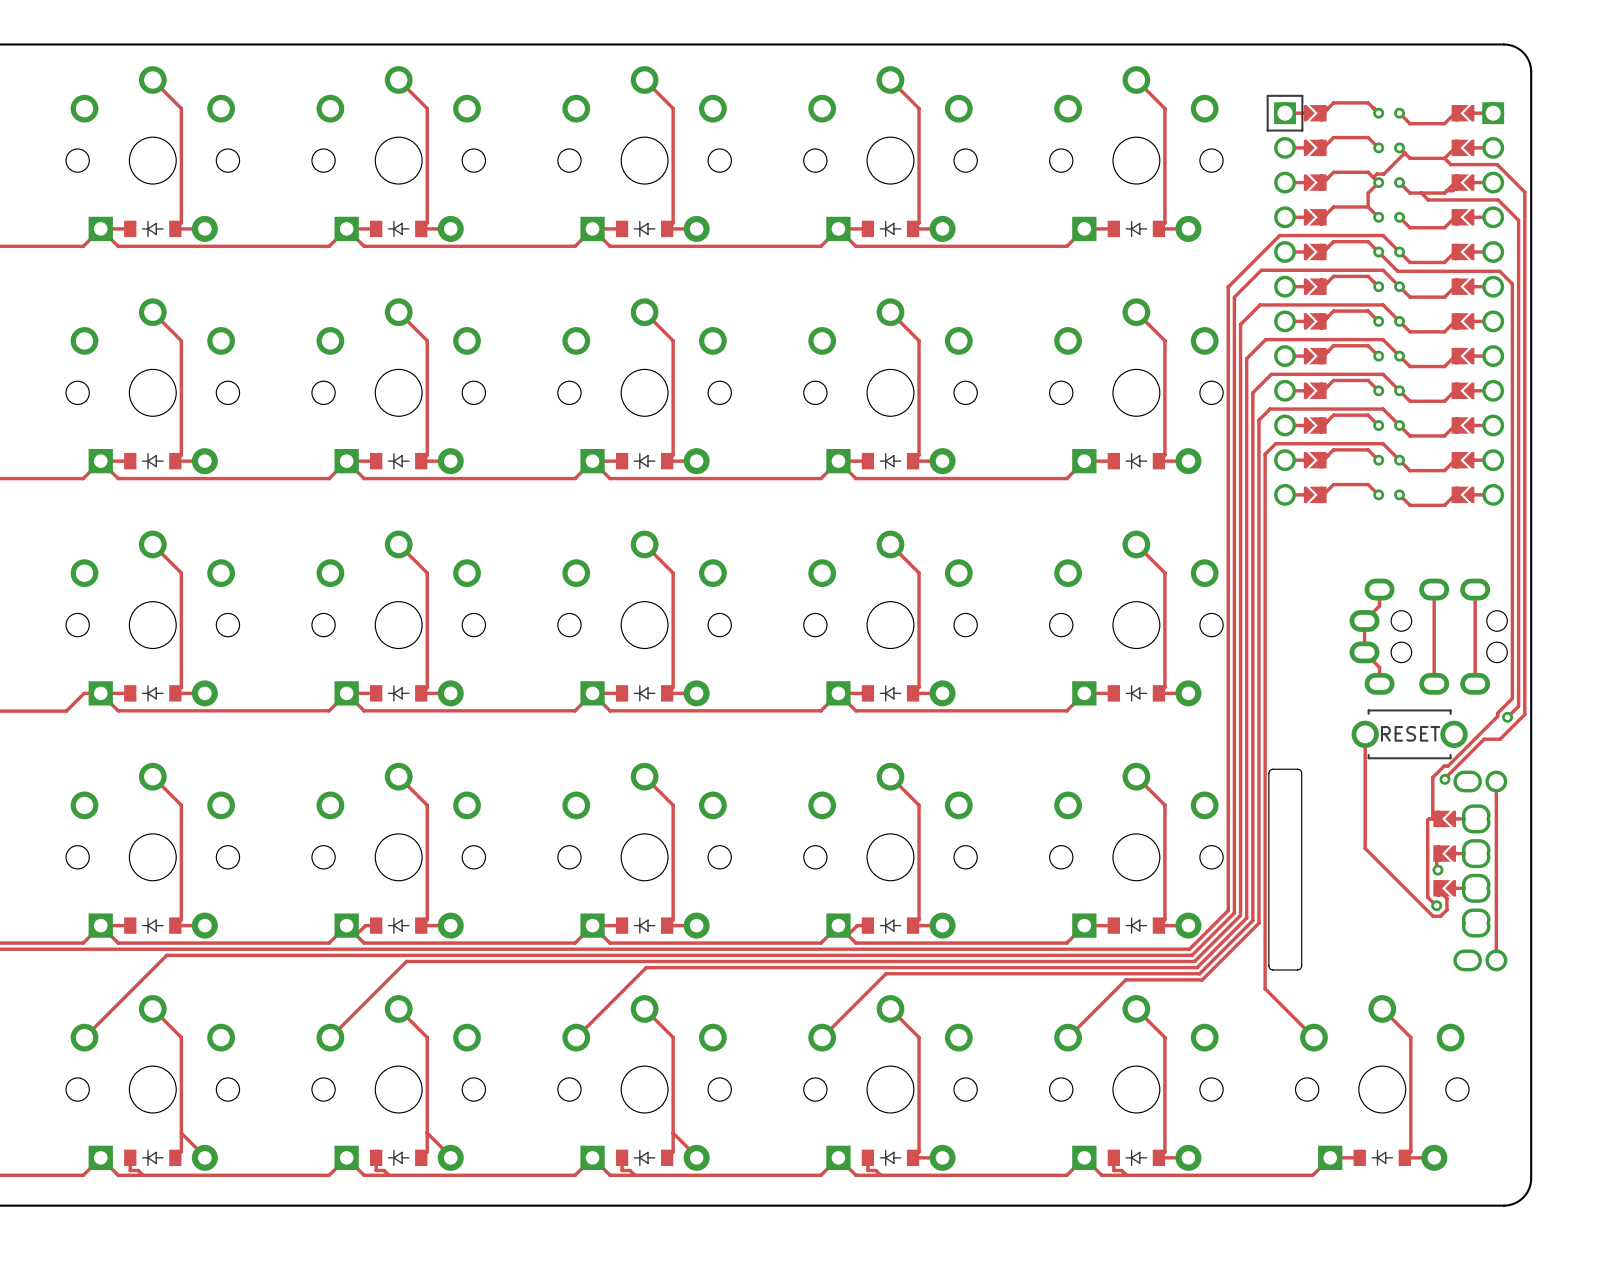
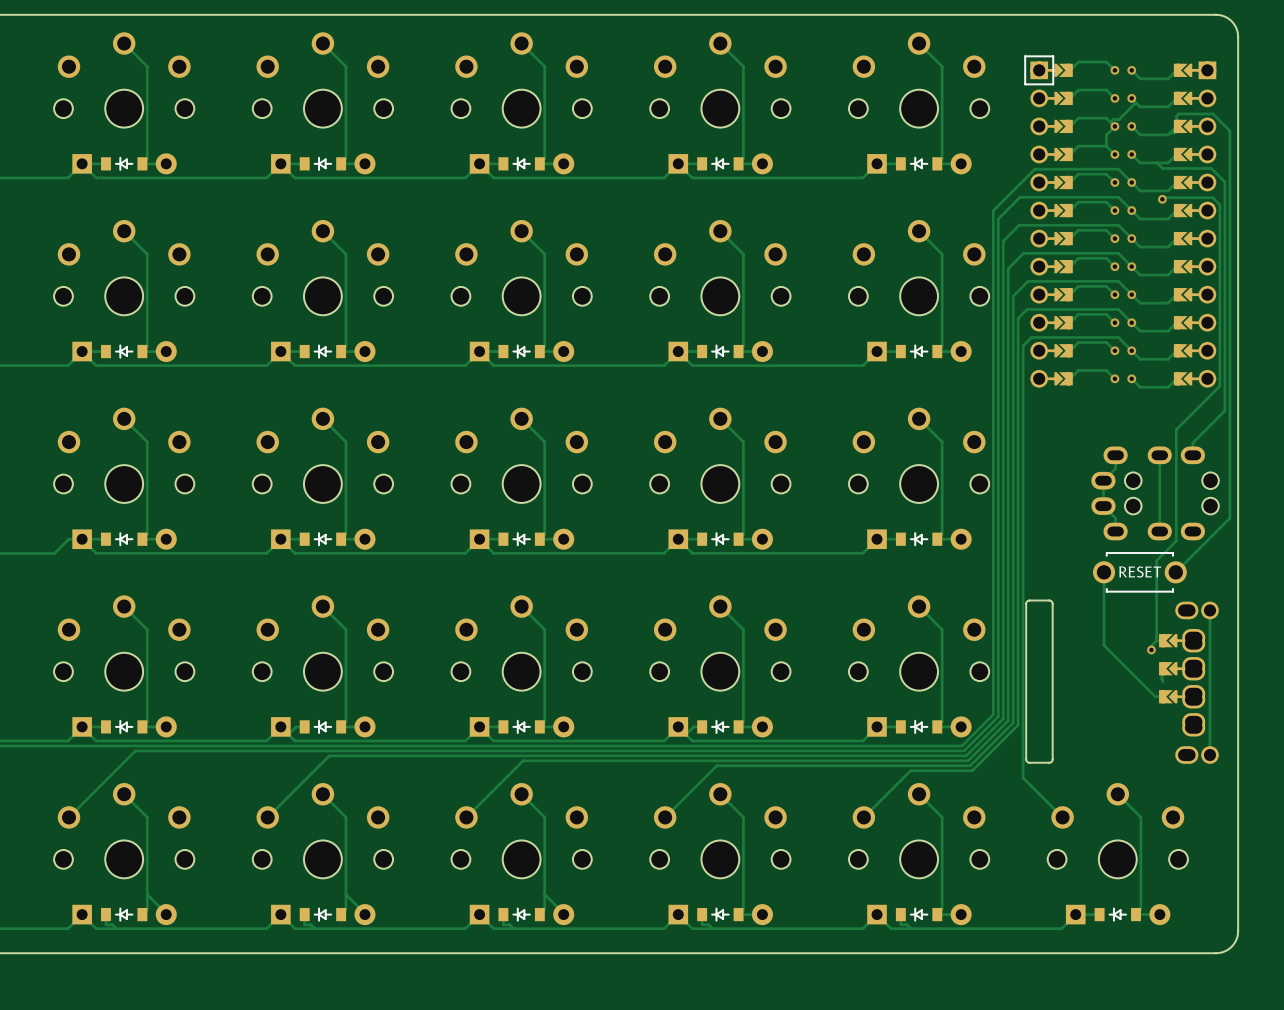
track: (1444, 158) (1450, 164) (1497, 164) (1524, 192) (1524, 714) (1500, 739) (1484, 739) (1444, 779) -> none
track: none -> (1176, 126) (1176, 116) (1178, 113) (1212, 113) (1229, 130) (1229, 518) (1175, 572)
track: (1421, 193) (1428, 199) (1498, 199) (1518, 220) (1518, 706) (1507, 717) -> none
track: (1378, 252) (1397, 271) (1499, 271) (1512, 283) (1512, 698) (1497, 713) (1497, 716) (1447, 766) (1444, 766) (1432, 777) (1432, 818) -> none
track: none -> (1162, 199) (1164, 197) (1212, 197) (1219, 204) (1219, 386) (1176, 429) (1176, 540) (1156, 560) (1156, 640) (1151, 645) (1151, 649)
via: none -> (1162, 199)
track: (1475, 589) (1475, 683) -> (1192, 455) (1192, 442) (1224, 410) (1224, 182) (1211, 168) (1162, 168) (1157, 162)
via: (1507, 717) -> none
via: (1444, 779) -> none
track: (1430, 818) (1427, 820) (1427, 897) (1436, 905) -> none
track: (1365, 824) (1365, 848) (1432, 916) (1440, 916) (1446, 909) (1446, 898) (1436, 888) -> (1104, 645) (1155, 696) (1161, 696)
via: none -> (1151, 649)
via: (1437, 870) -> none
via: (1436, 905) -> none

